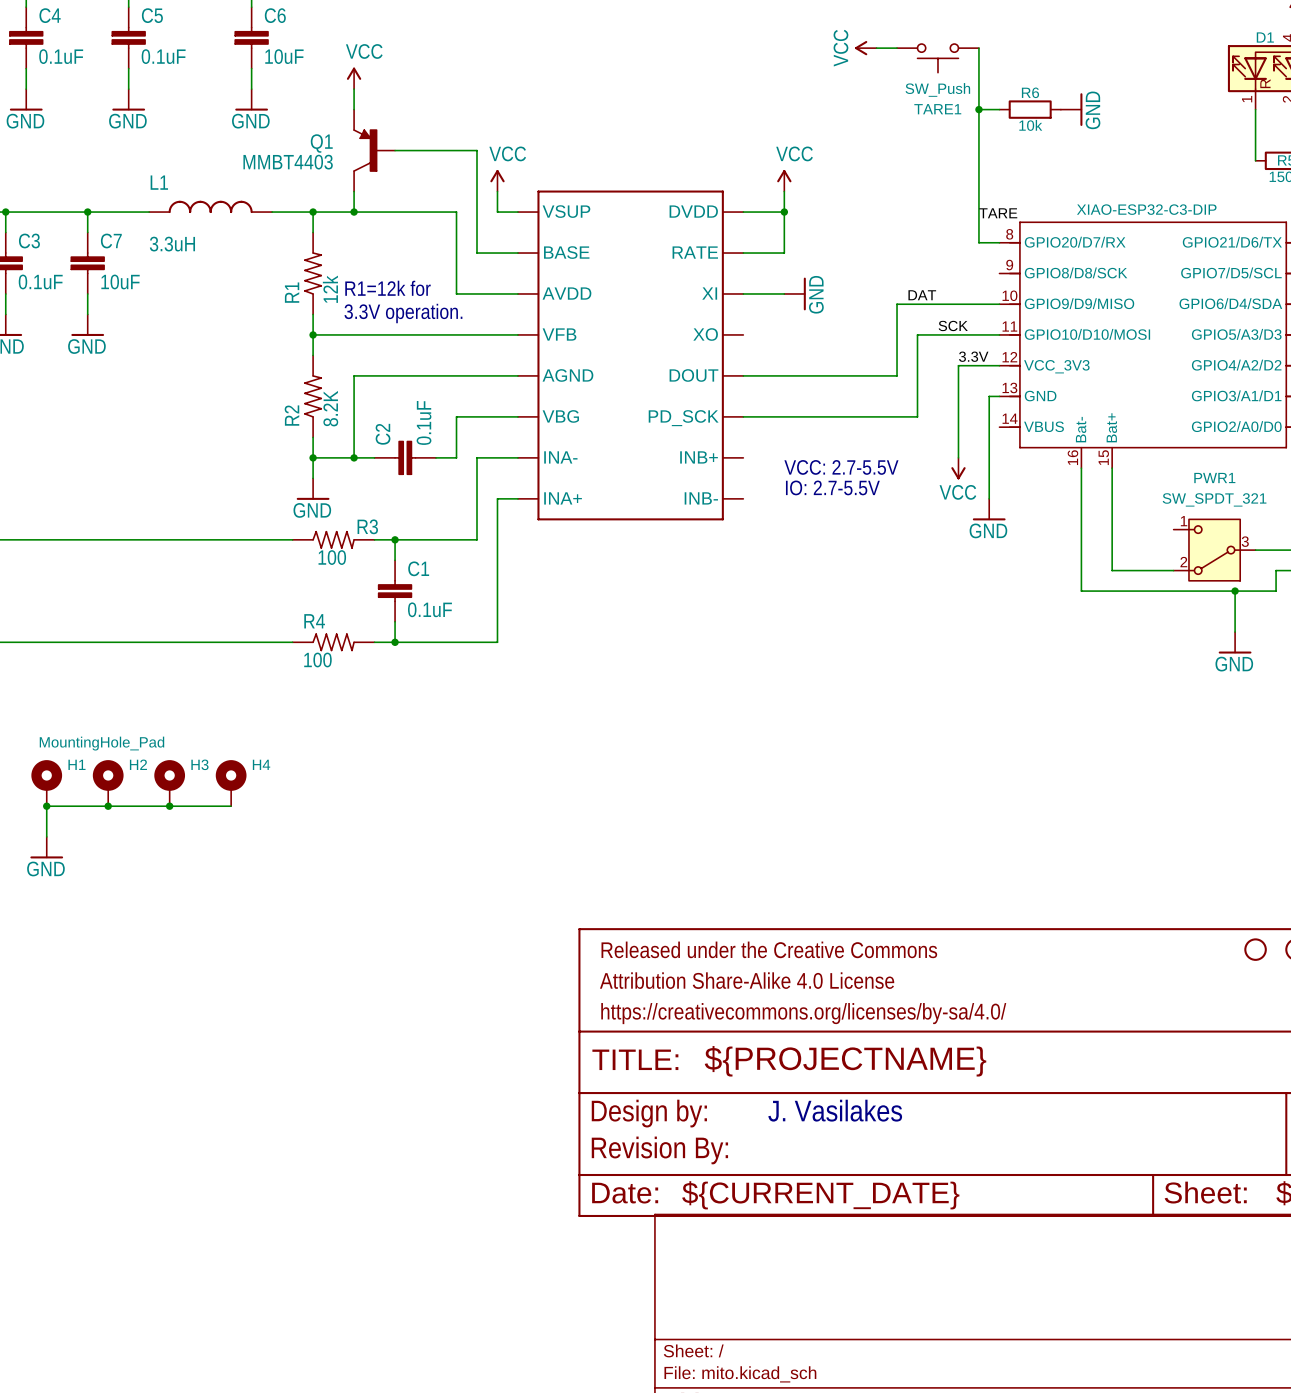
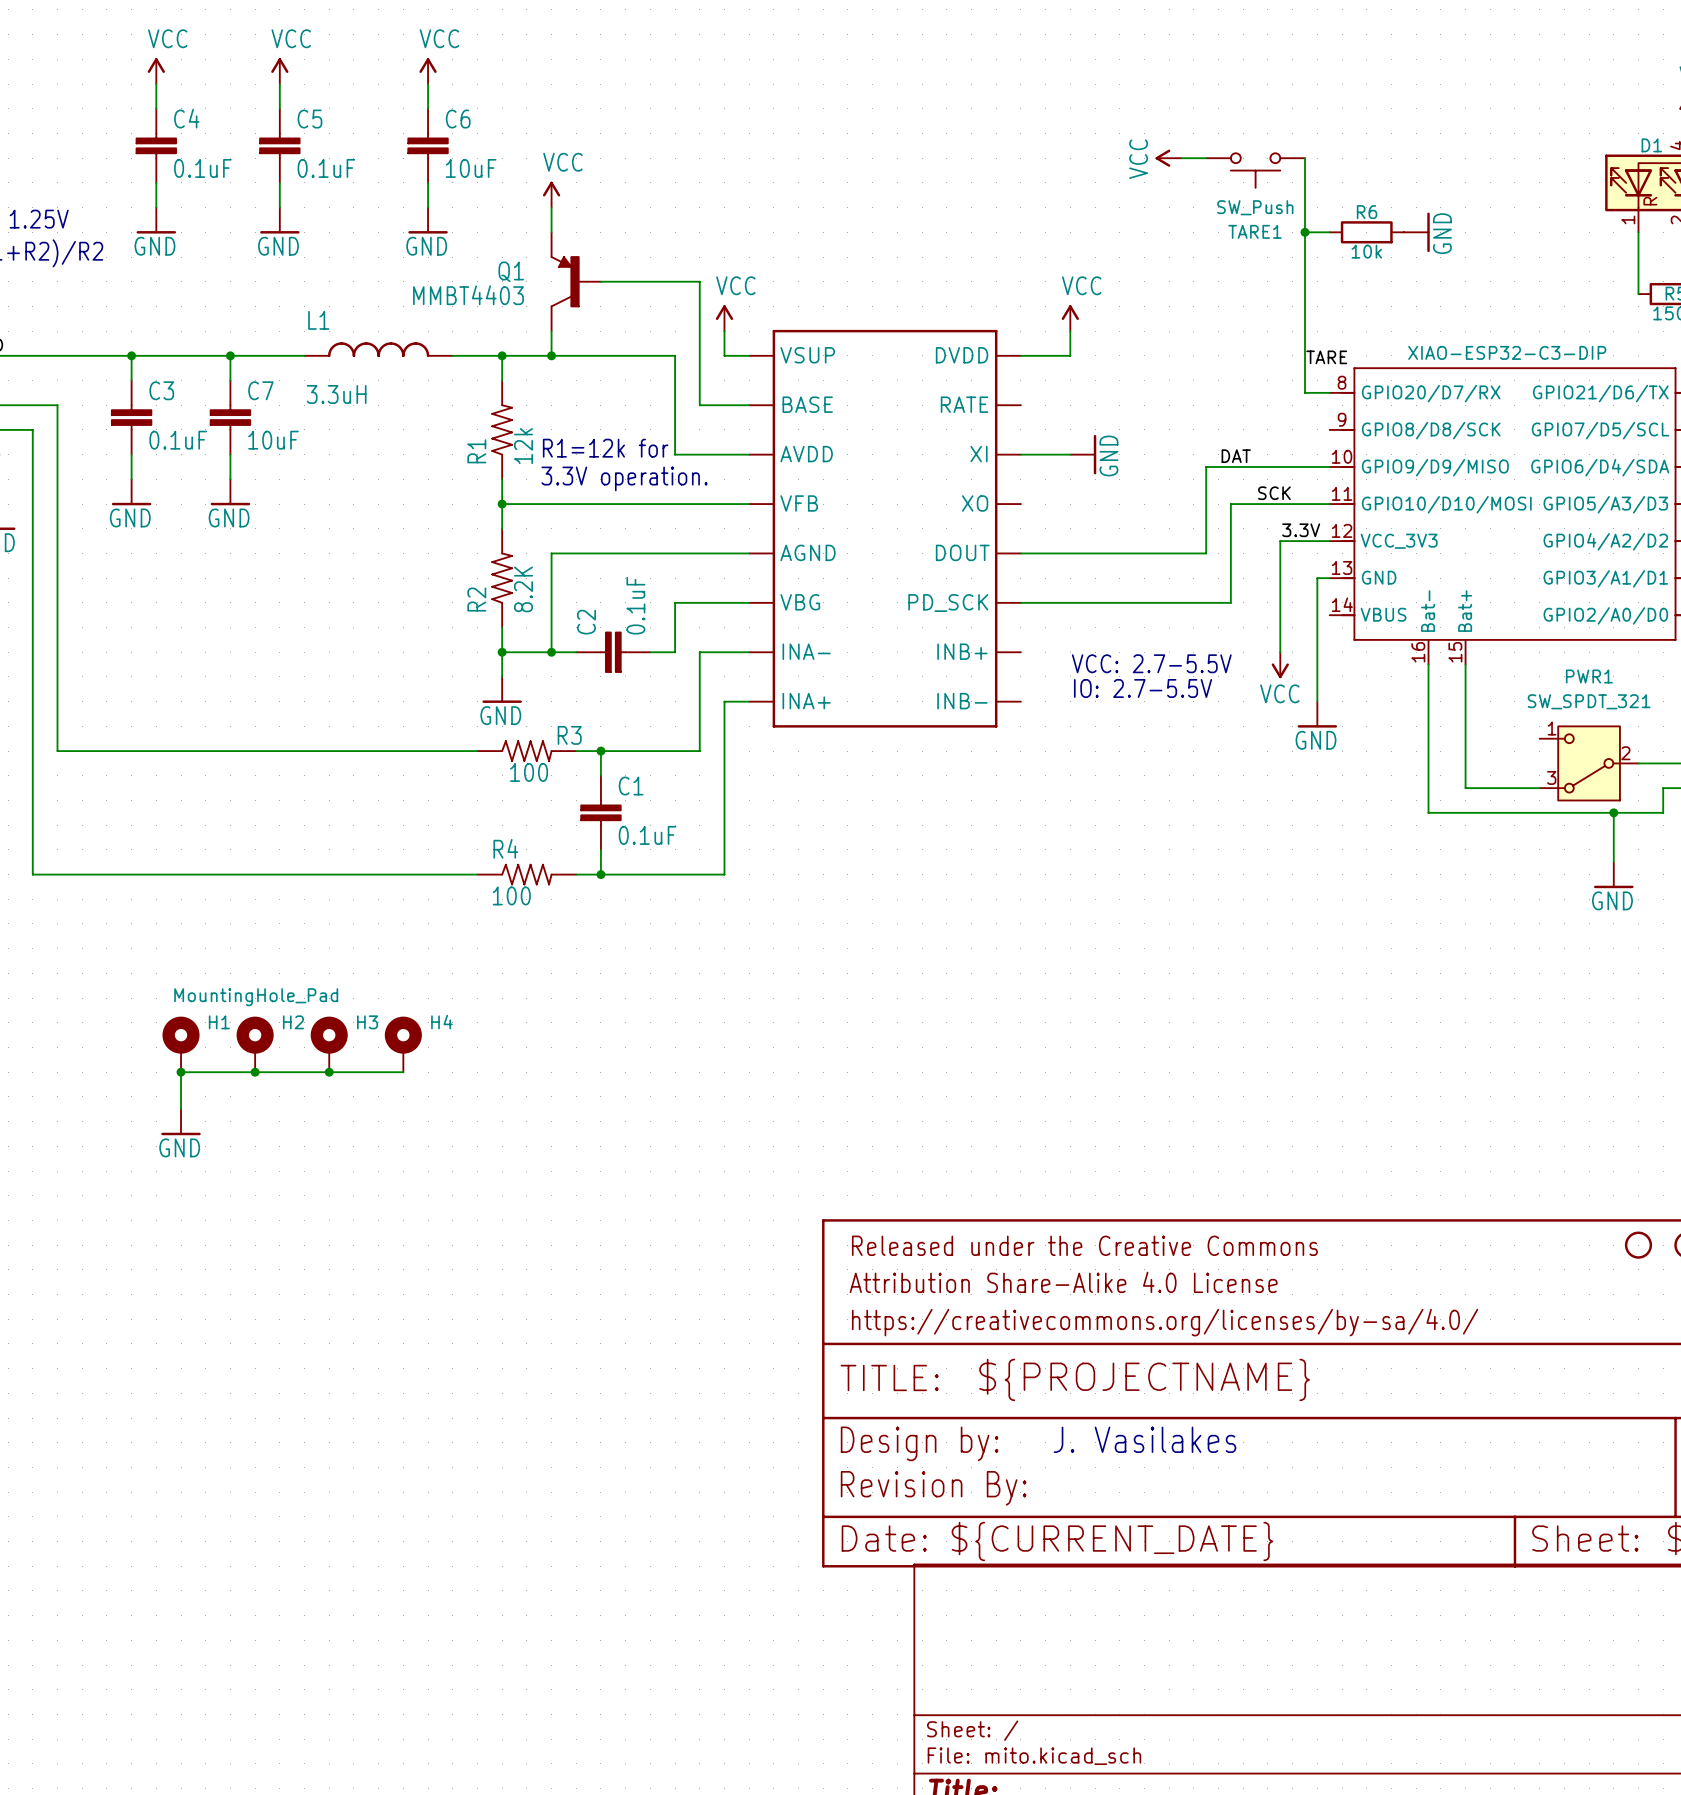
wire: (784, 212) (784, 253) (743, 253) -> none
junction: (784, 212) -> none
PWR1 pin number: 3 (1245, 541) -> 2 (1625, 753)
PWR1 pin number: 2 (1183, 562) -> 3 (1551, 777)

